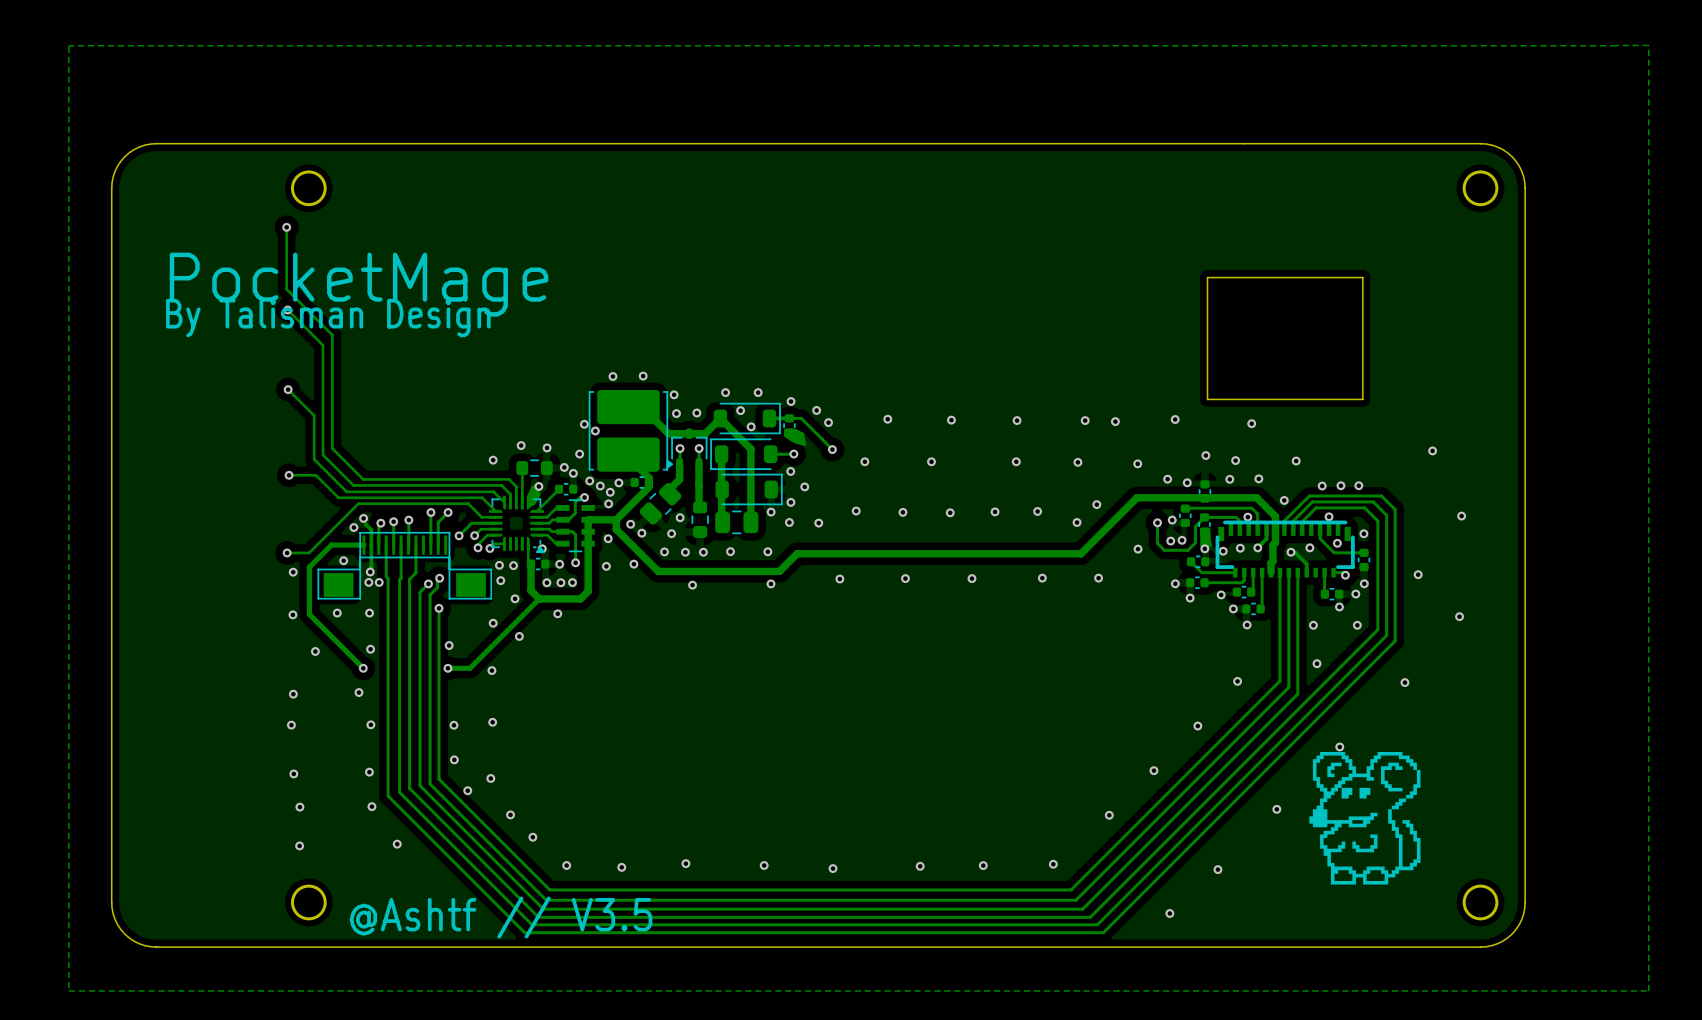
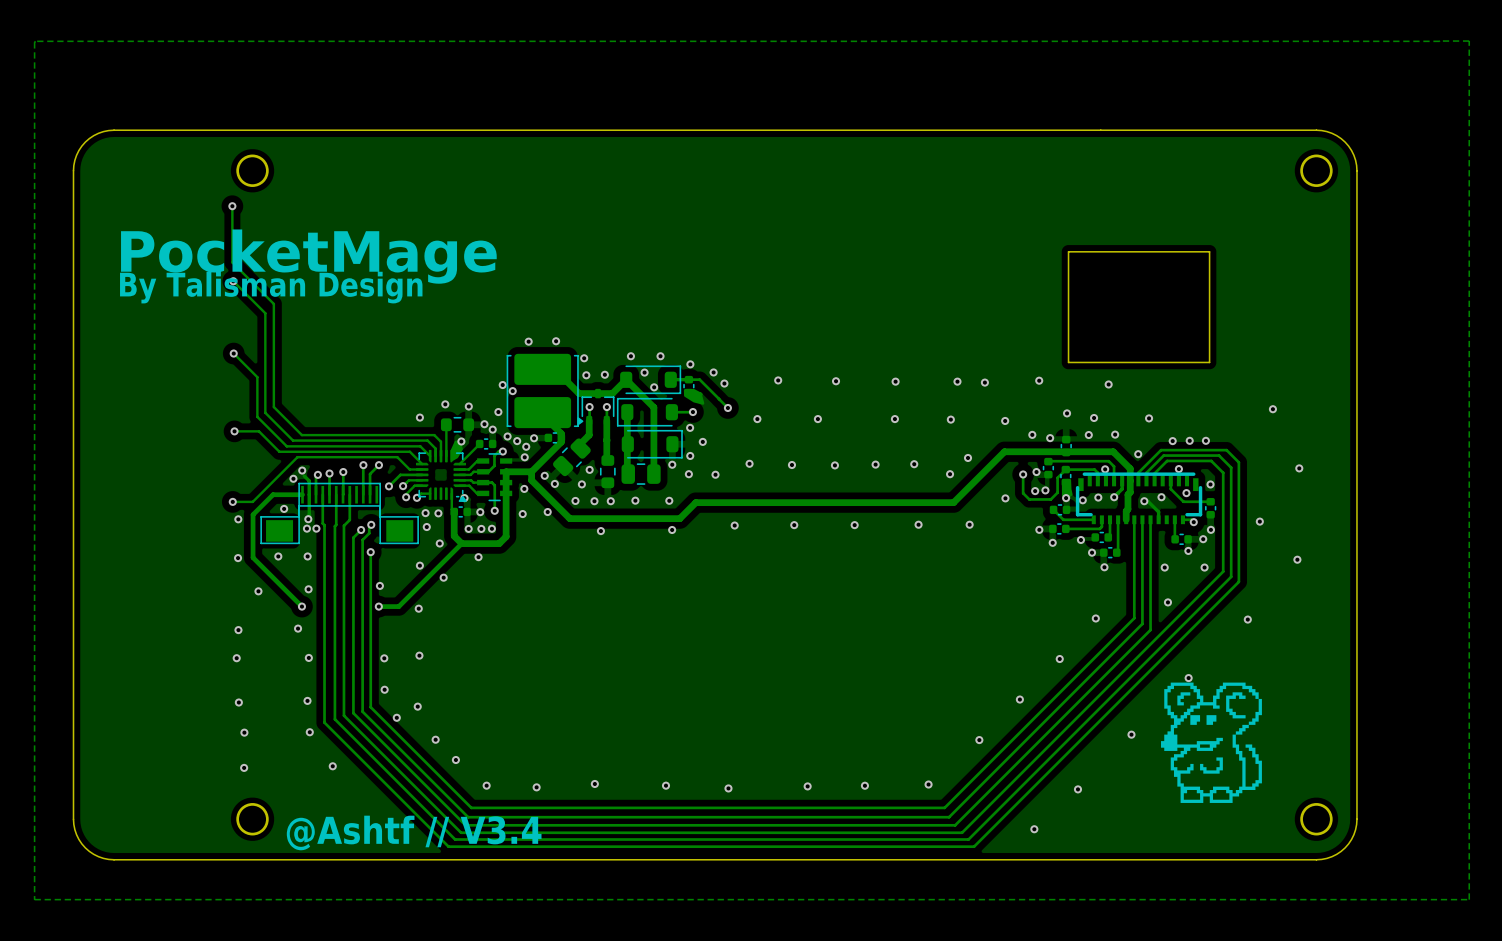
text: @Ashtf // V3.5 (501, 917) -> @Ashtf // V3.4 (414, 832)

